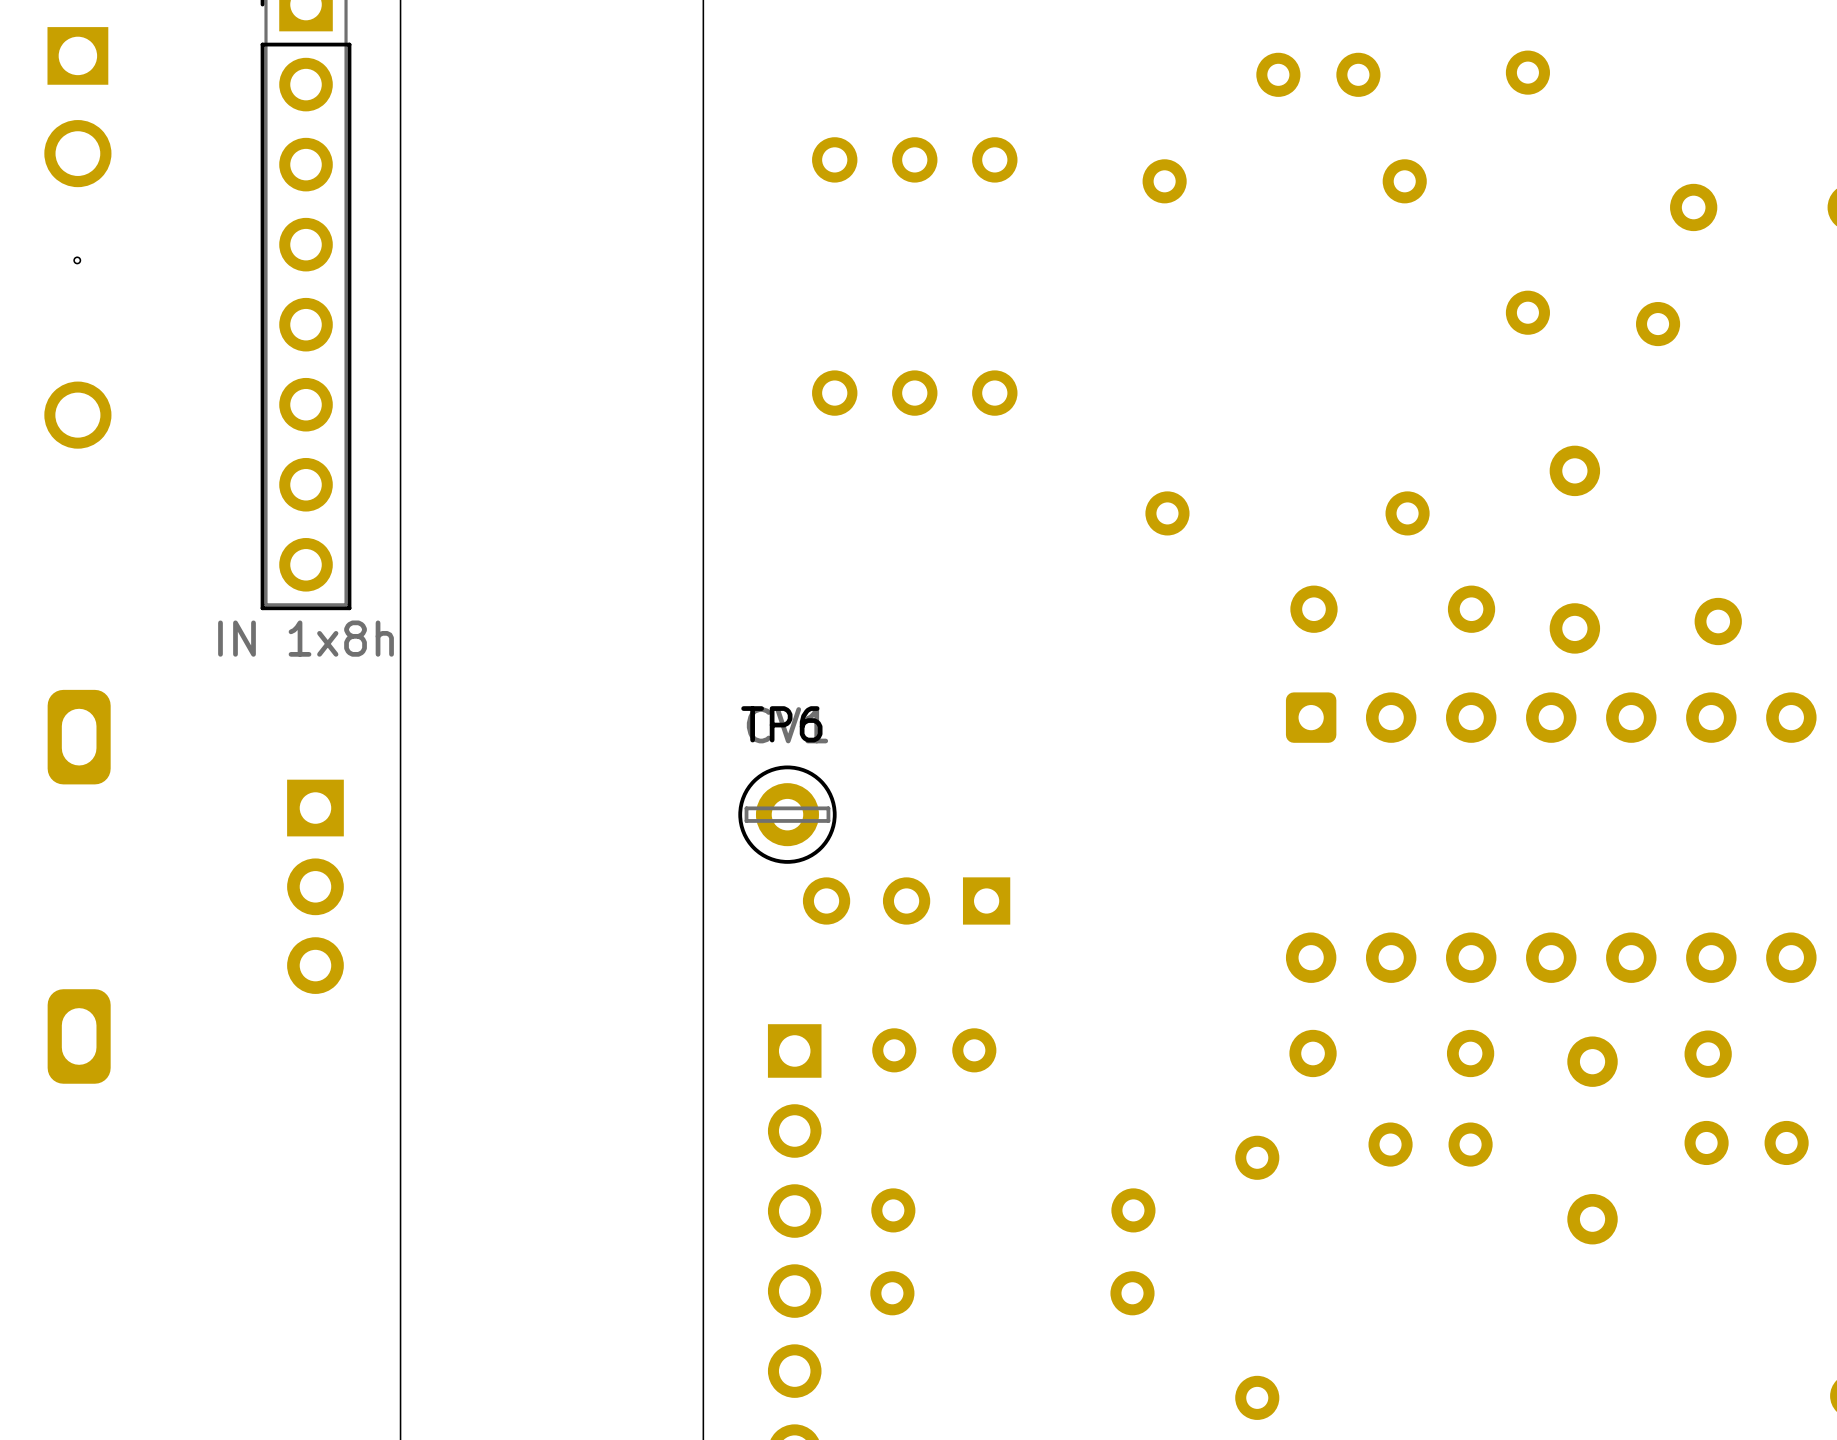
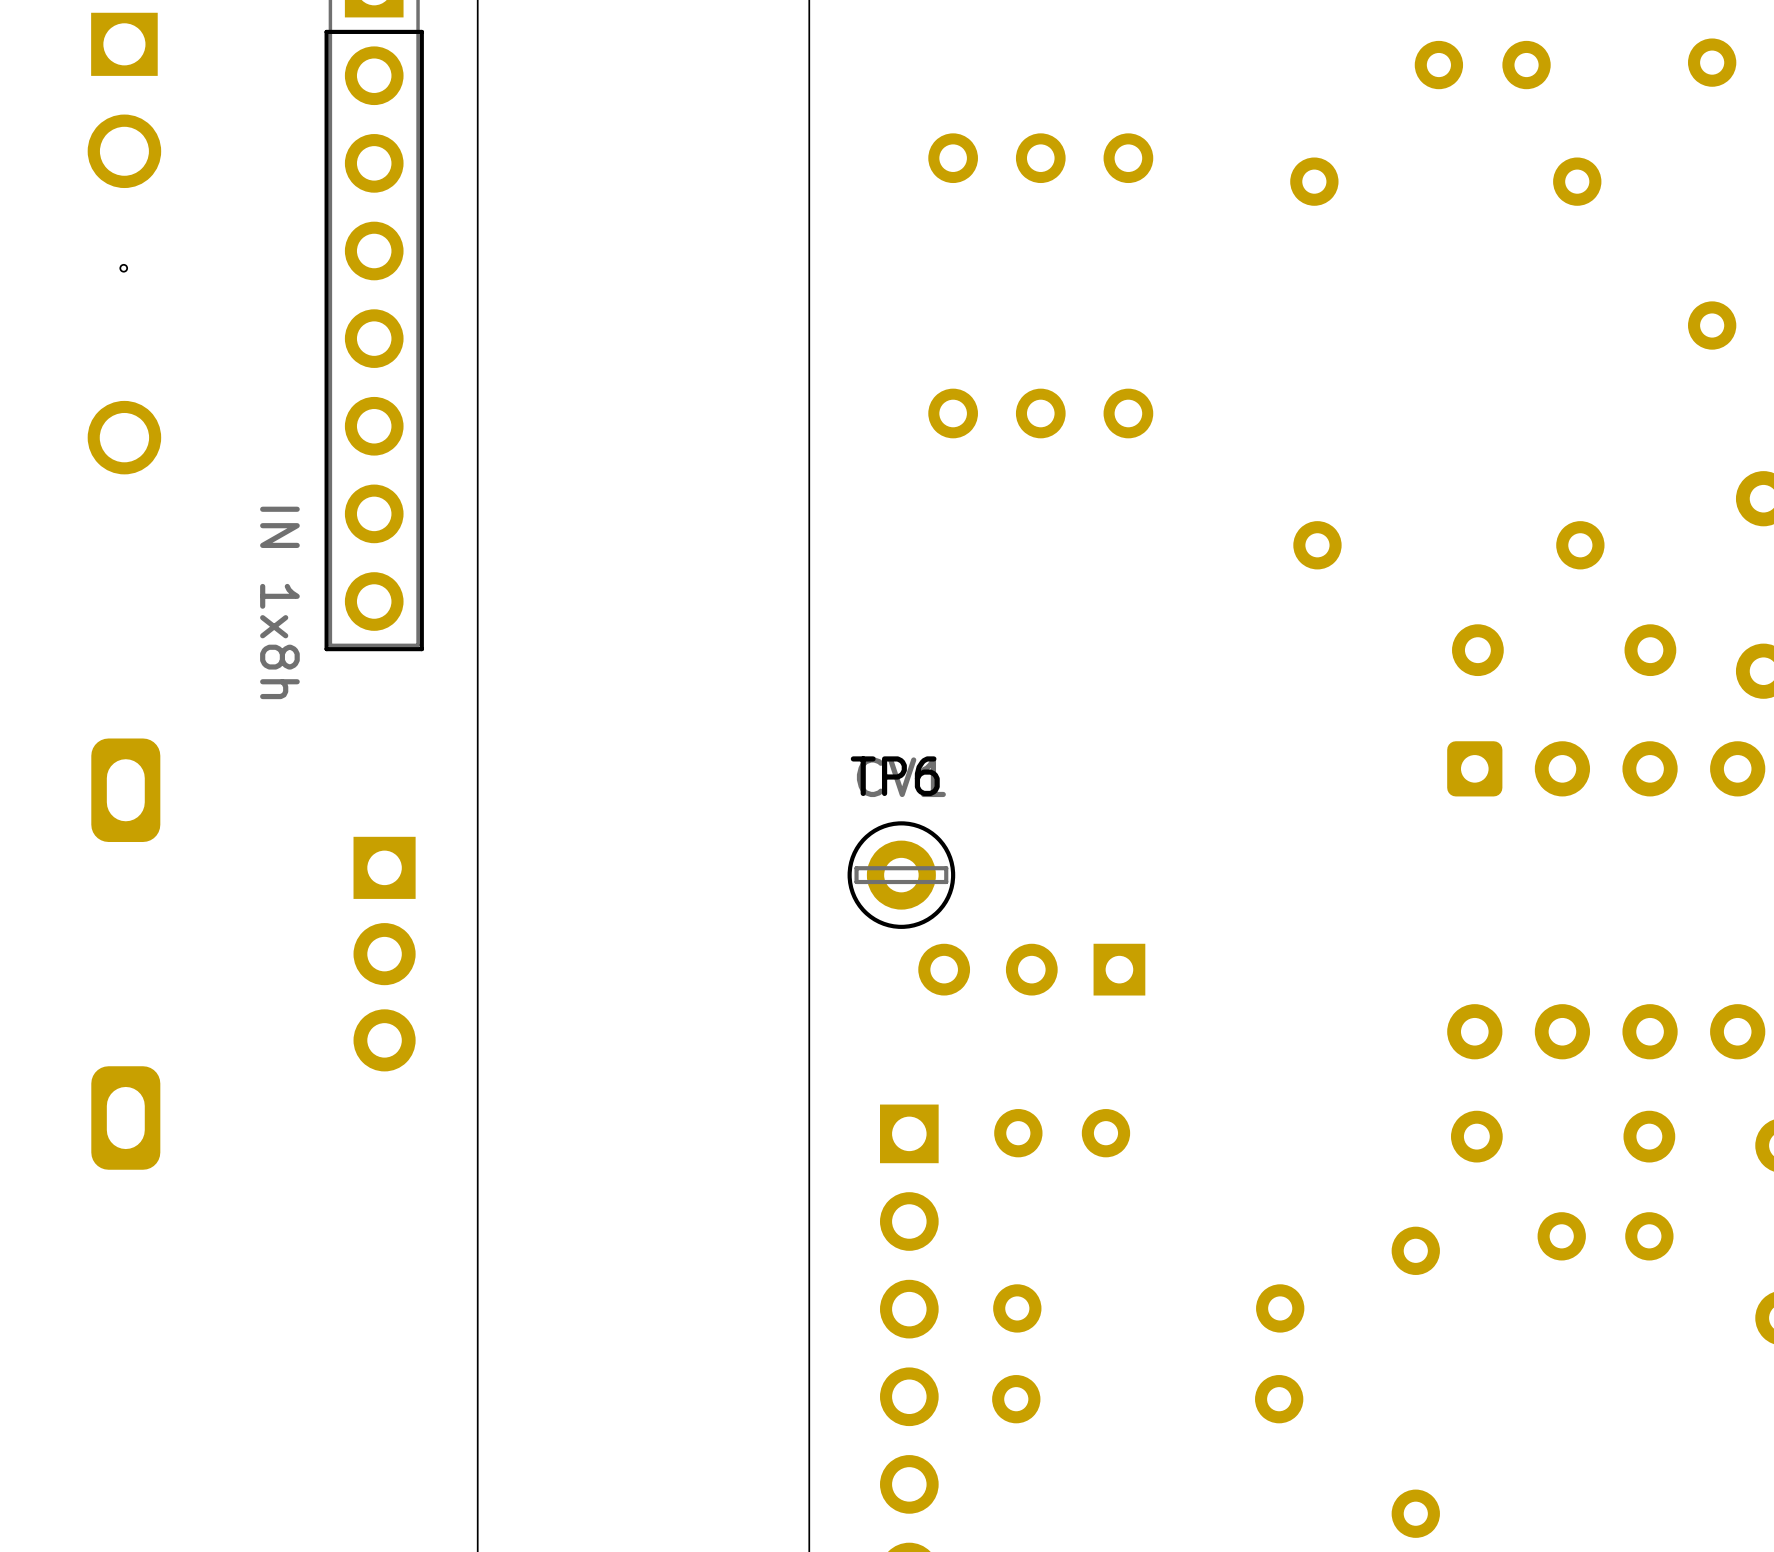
part value rotation: 0° (306, 638) -> 90° clockwise (279, 602)

